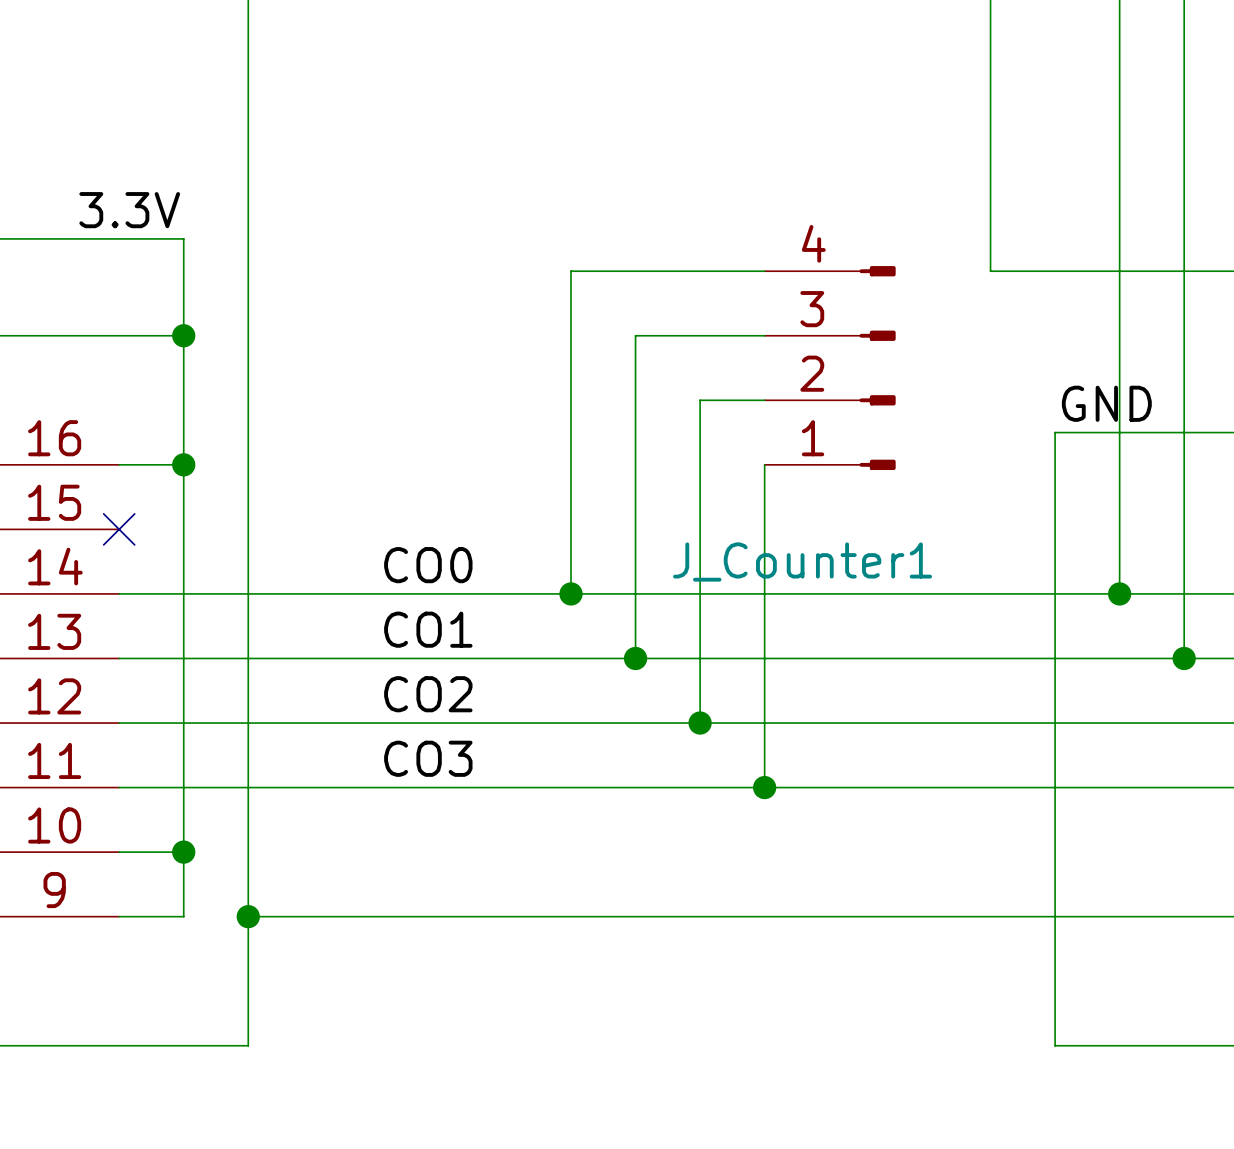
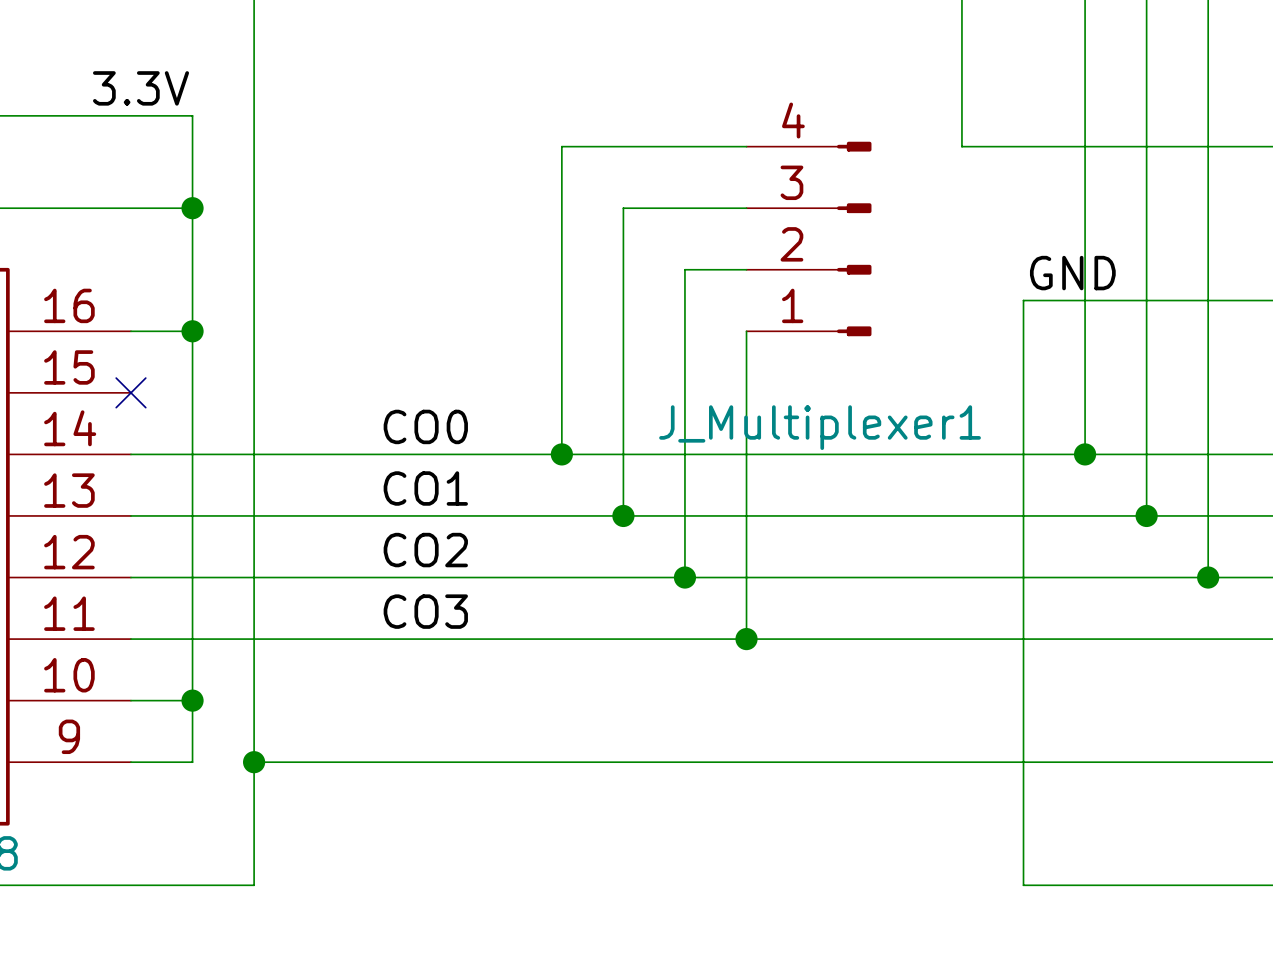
J_Counter1 name: J_Counter1 (802, 561) -> J_Multiplexer1 (820, 427)

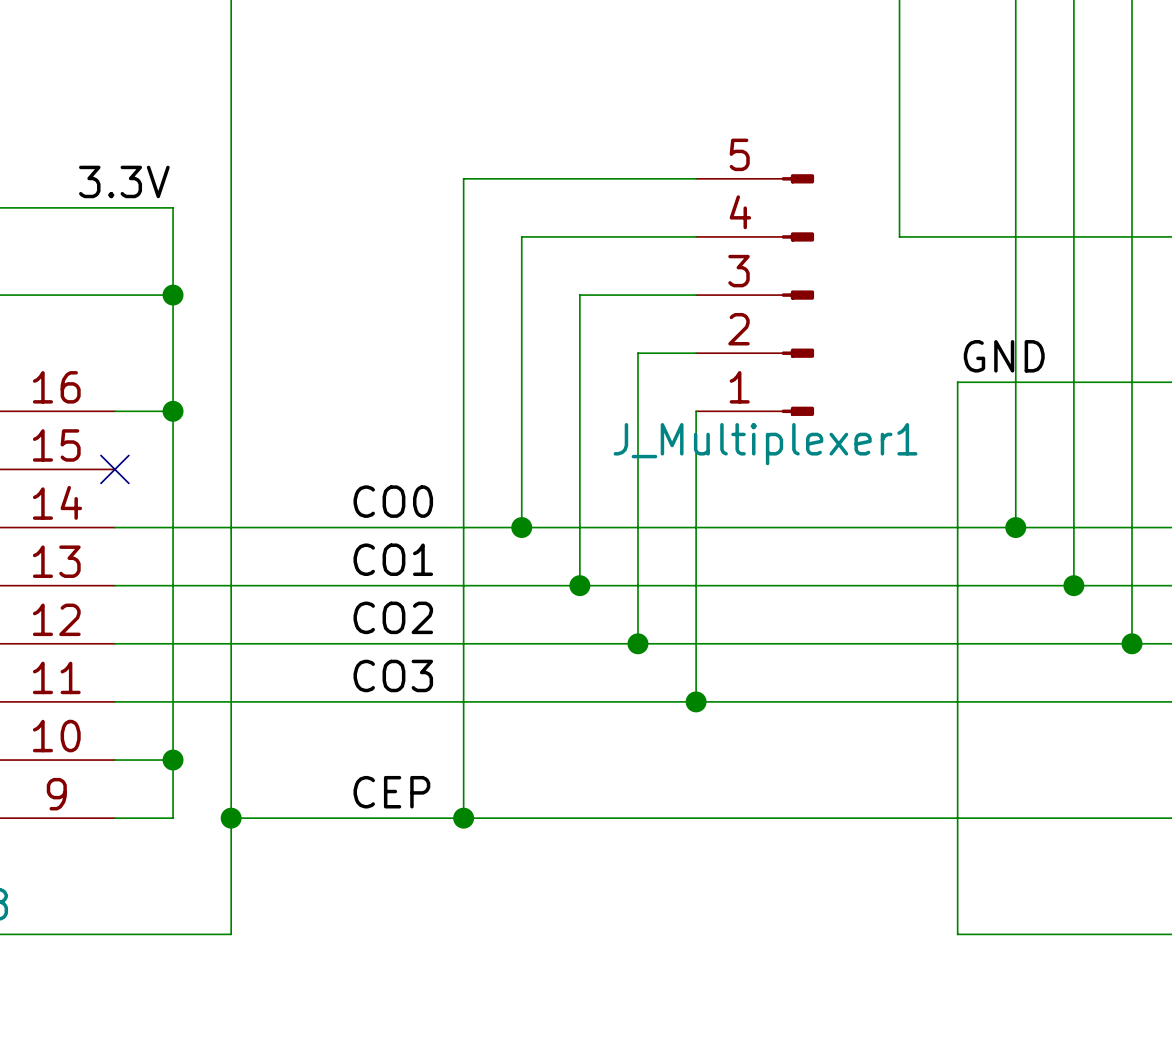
wire: none -> (696, 178) (463, 178) (463, 818)
J_Multiplexer1 symbol: [746, 141, 872, 337] -> [696, 174, 815, 416]
label: none -> CEP (391, 792)
junction: none -> (463, 818)

